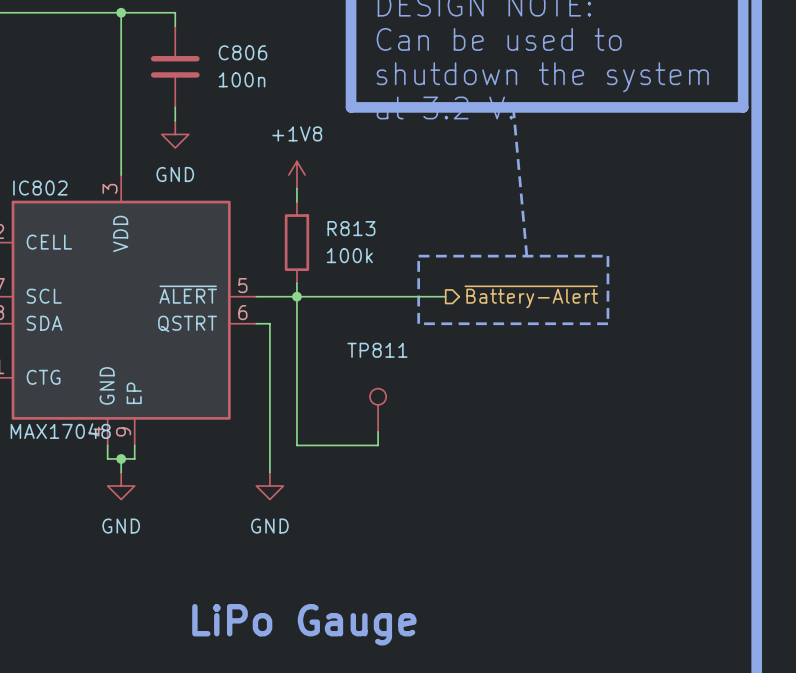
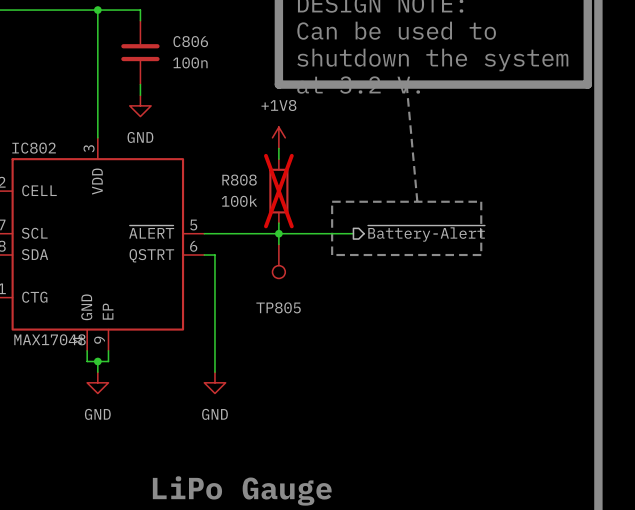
power symbol position: +1V8 (296, 175) -> +1V8 (278, 137)
wire: (296, 188) (296, 202) -> (278, 148) (278, 159)
R813: 100k (296, 242) -> none
R808: none -> 100k (278, 191)
wire: (296, 283) (296, 445) (378, 445) (378, 431) -> none
wire: none -> (278, 223) (278, 244)
junction position: (296, 296) -> (278, 233)
TP805: none -> (278, 261)
TP811: (378, 410) -> none

